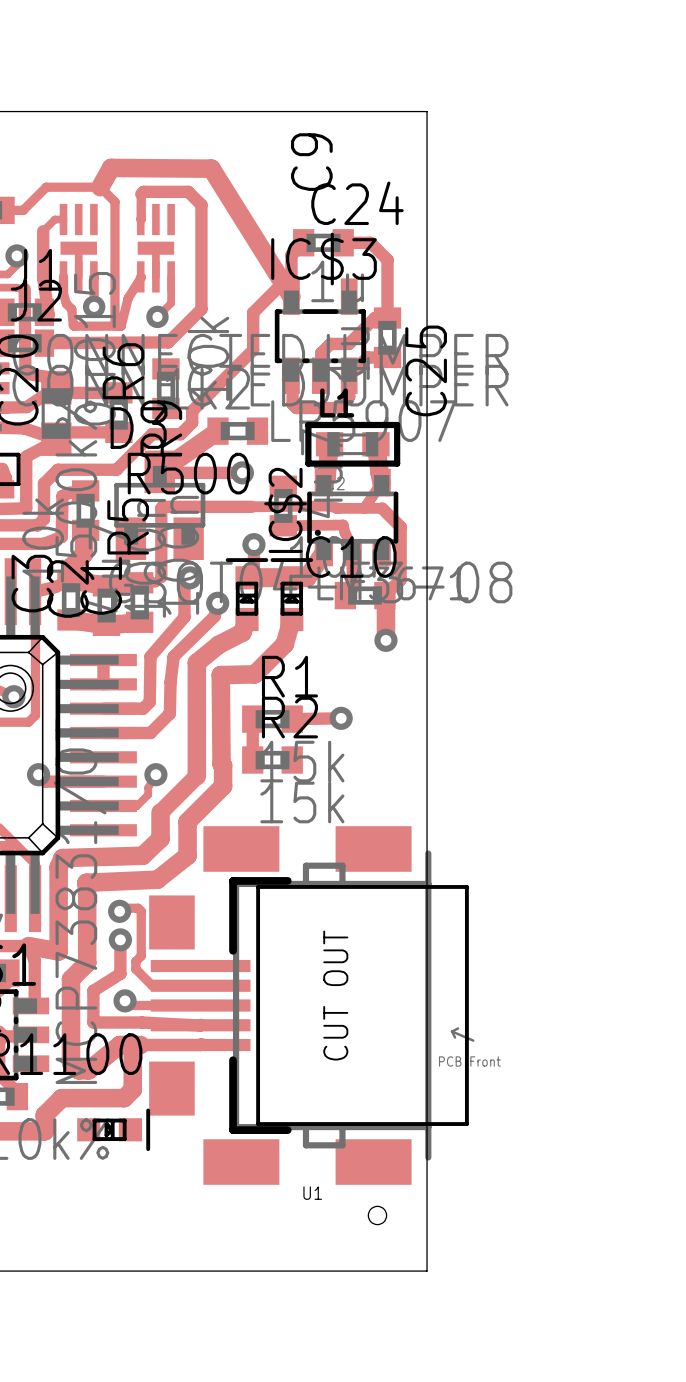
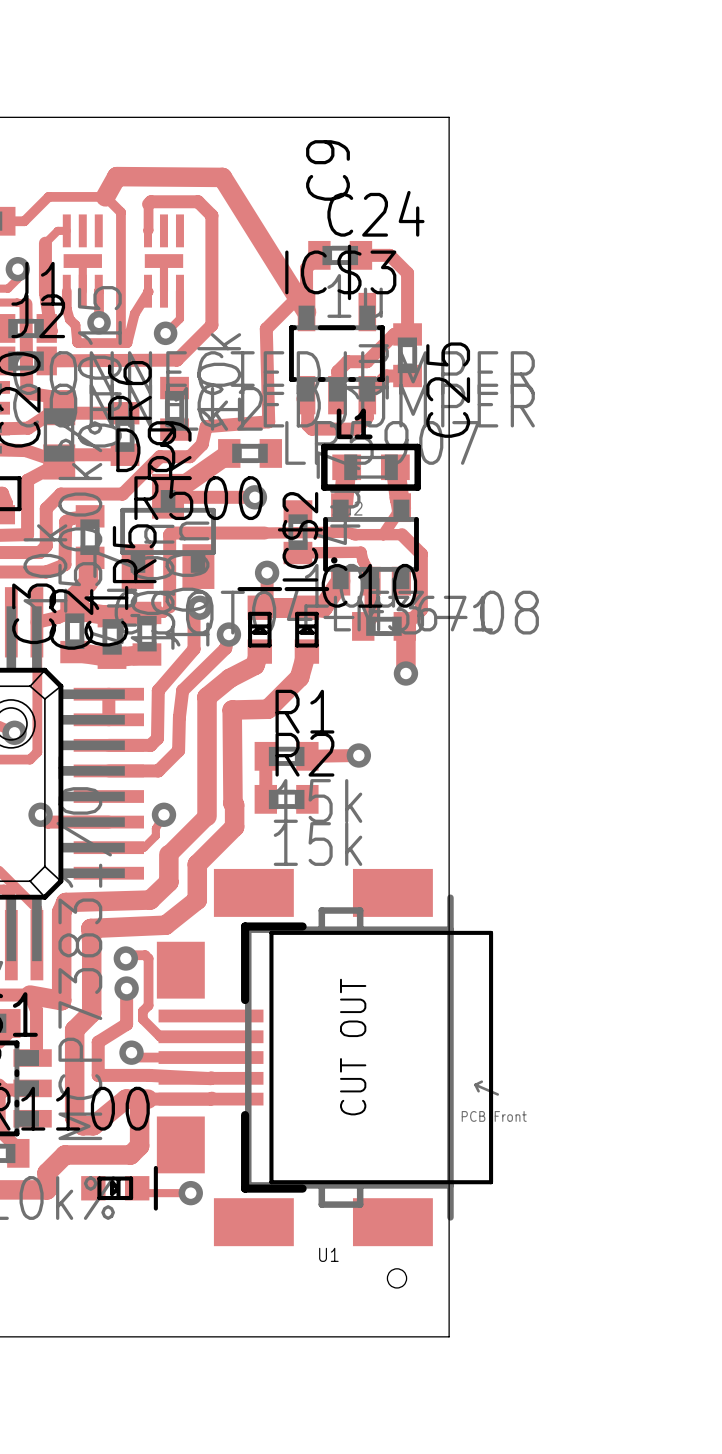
track: (253, 312) (253, 350) (192, 411) (192, 422) -> (266, 328) (268, 421) (206, 426) (202, 444)
track: none -> (137, 1188) (142, 1193) (190, 1193)
via: none -> (190, 1193)

